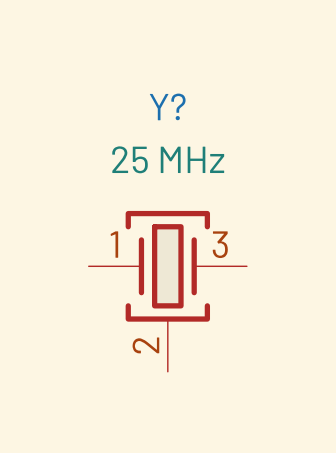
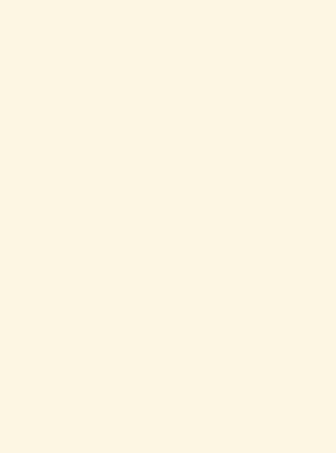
Y?: (167, 291) -> none

